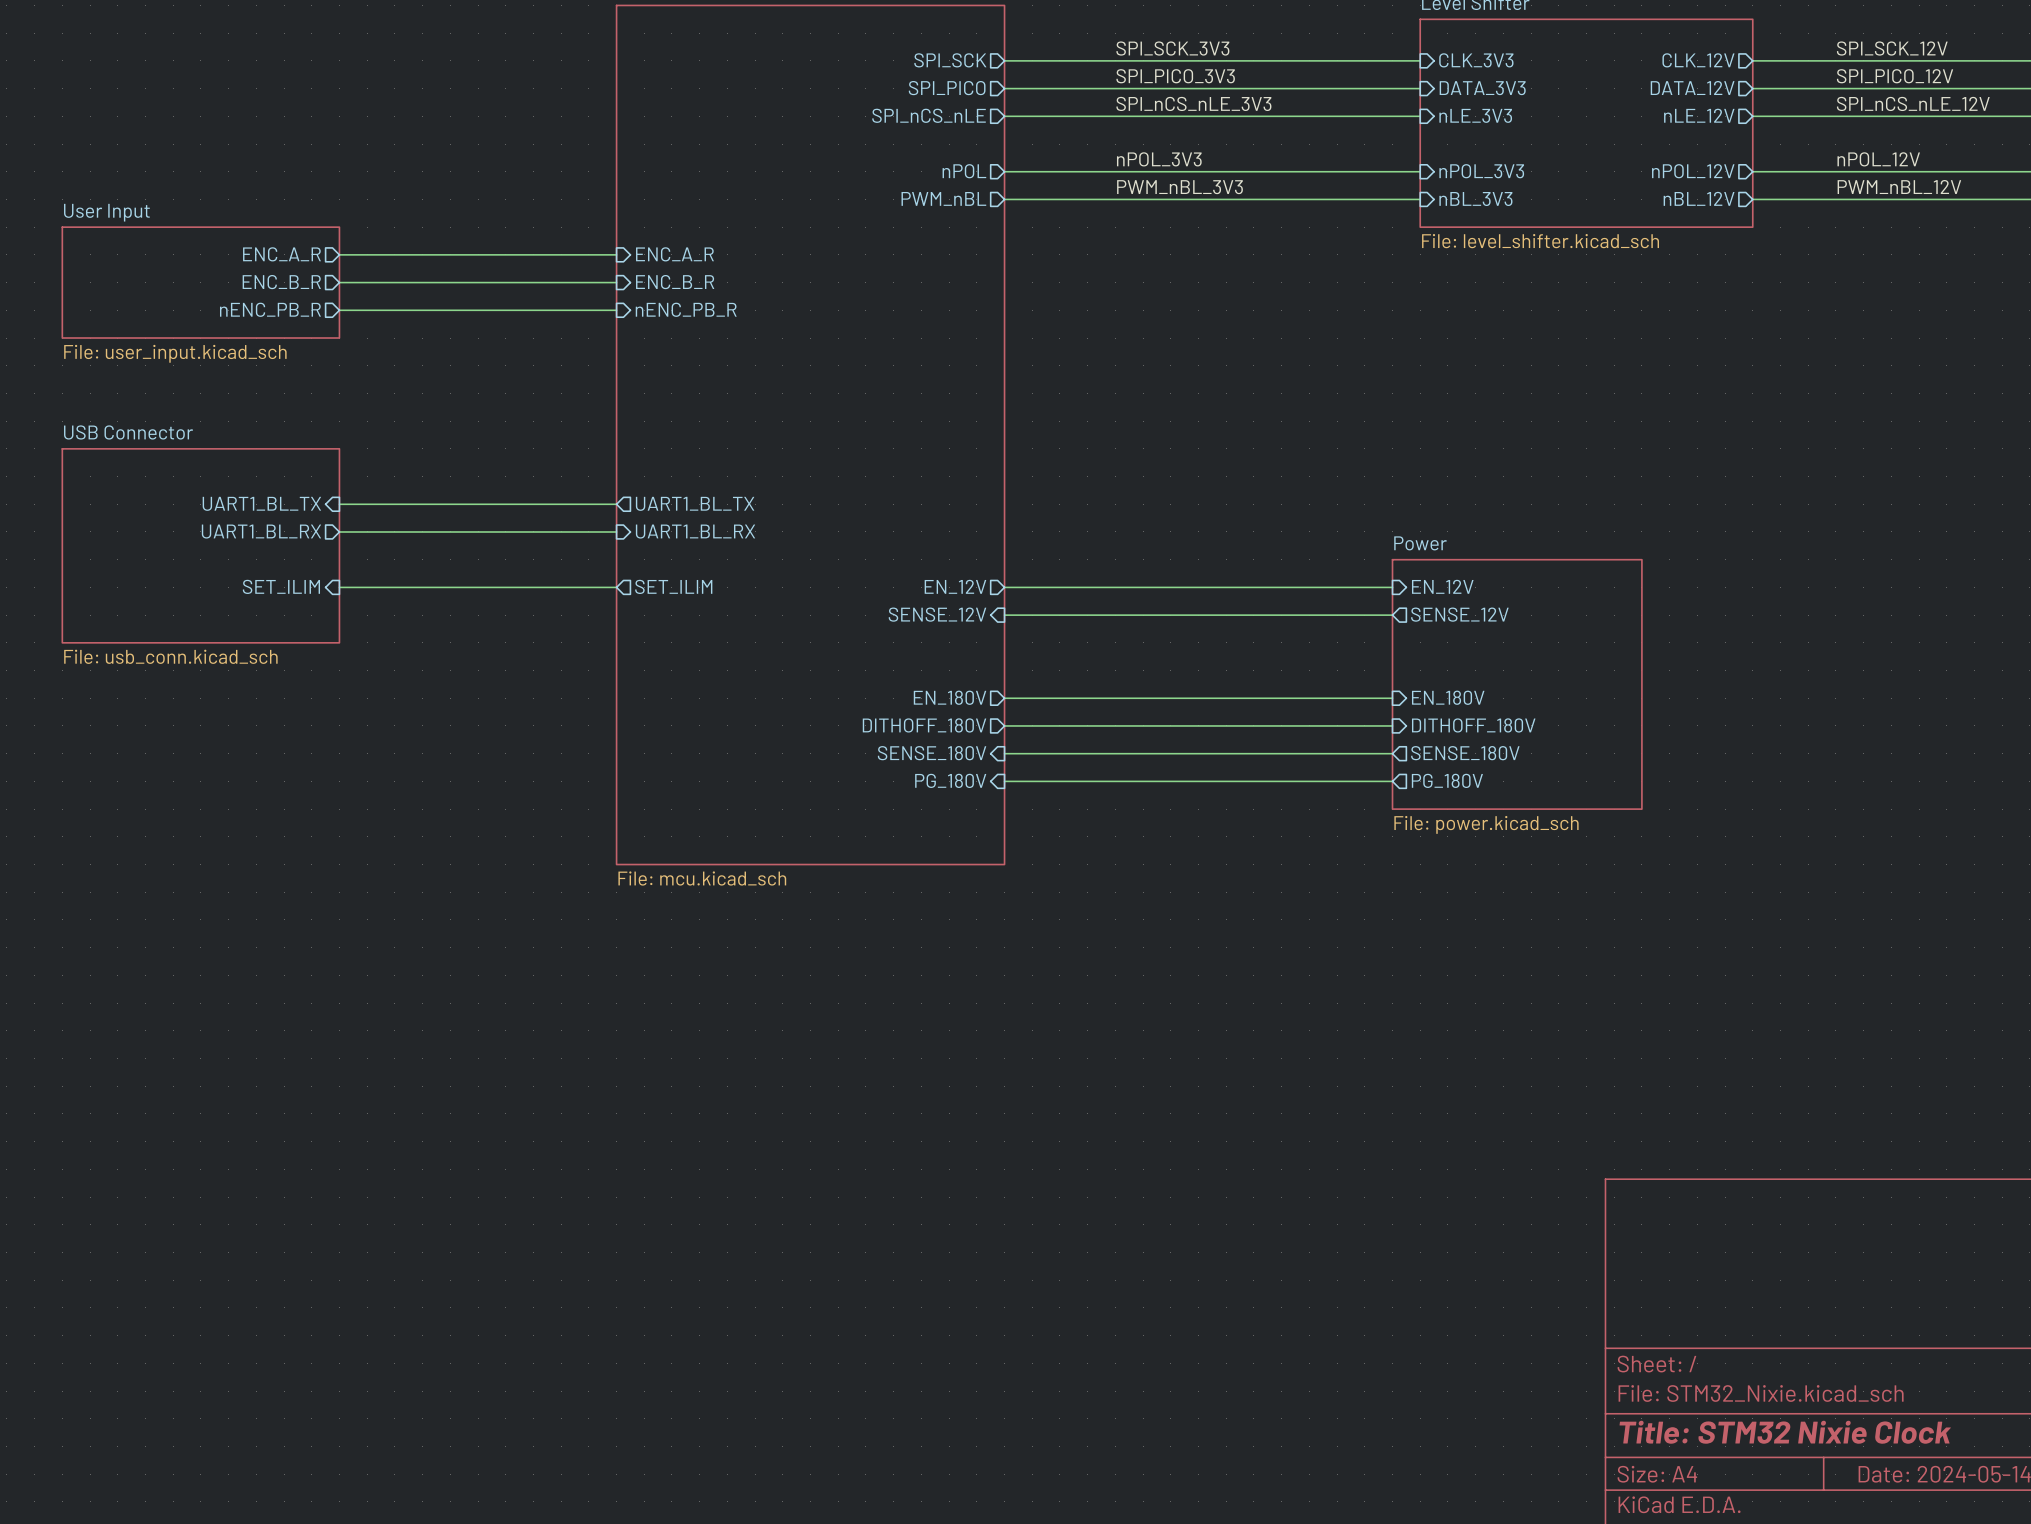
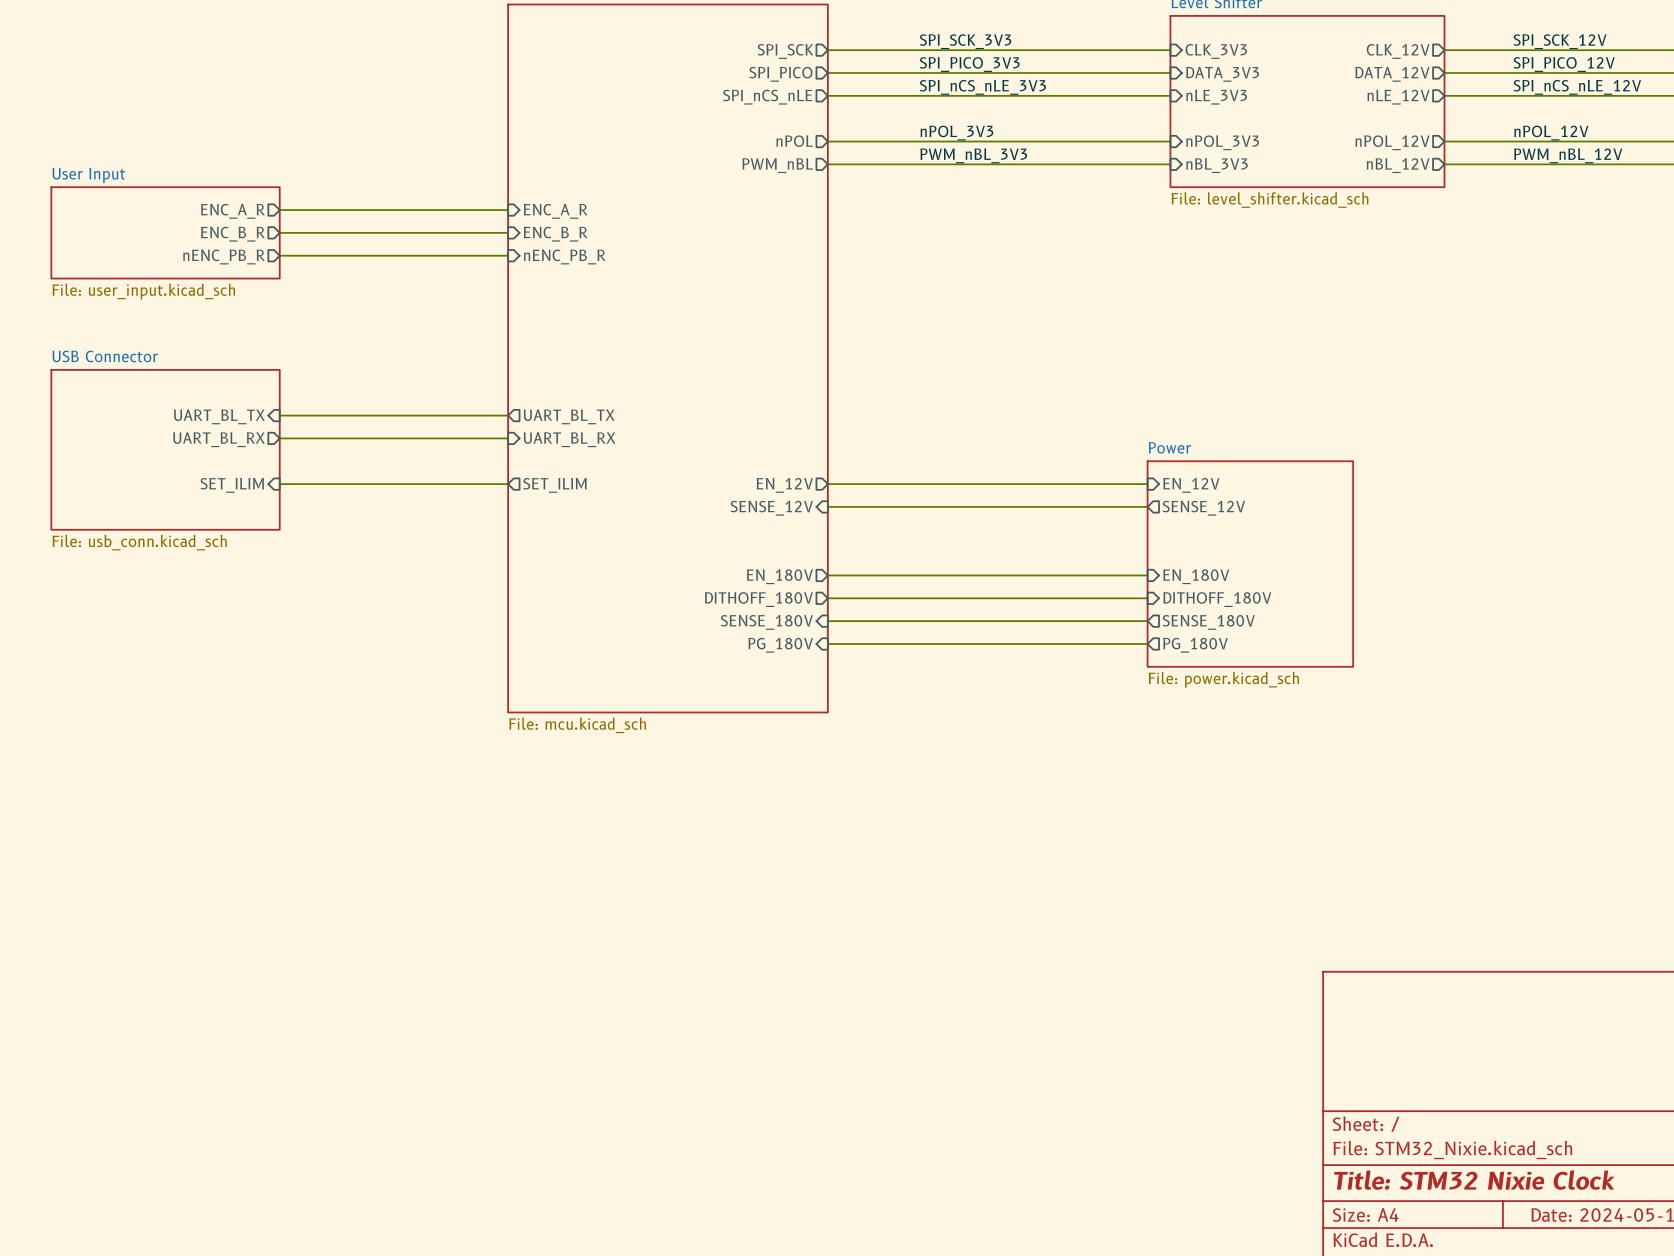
sheet pin: UART1_BL_TX (261, 503) -> UART_BL_TX (219, 416)
sheet pin: UART1_BL_TX (695, 503) -> UART_BL_TX (569, 416)
sheet pin: UART1_BL_RX (261, 531) -> UART_BL_RX (218, 439)
sheet pin: UART1_BL_RX (695, 531) -> UART_BL_RX (569, 439)

